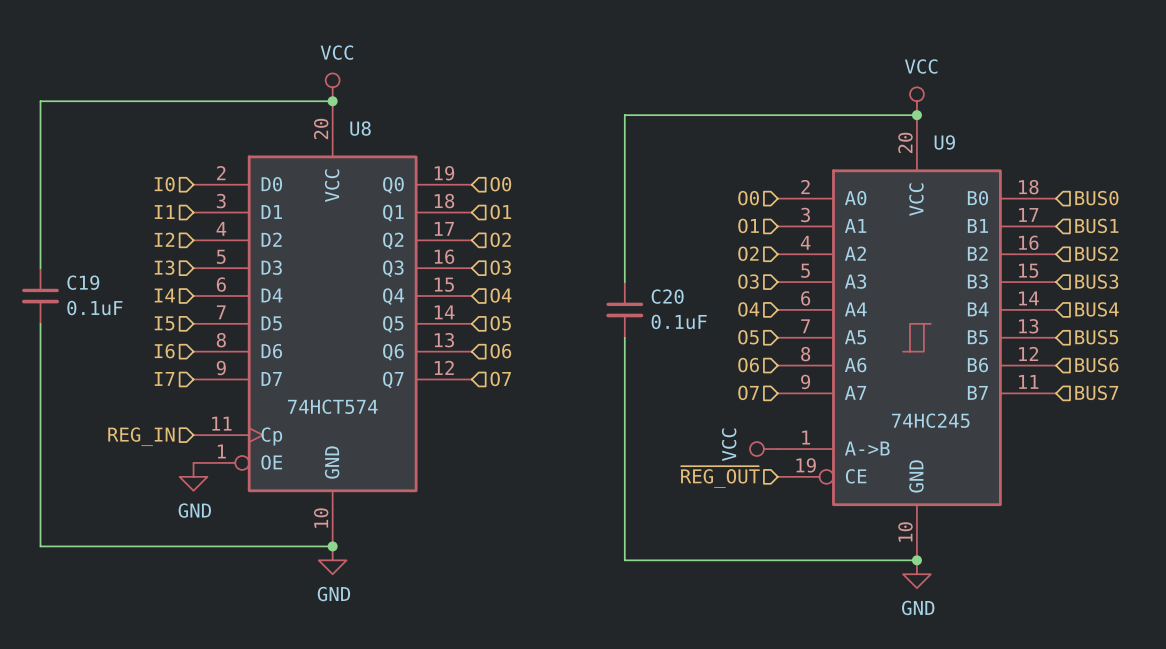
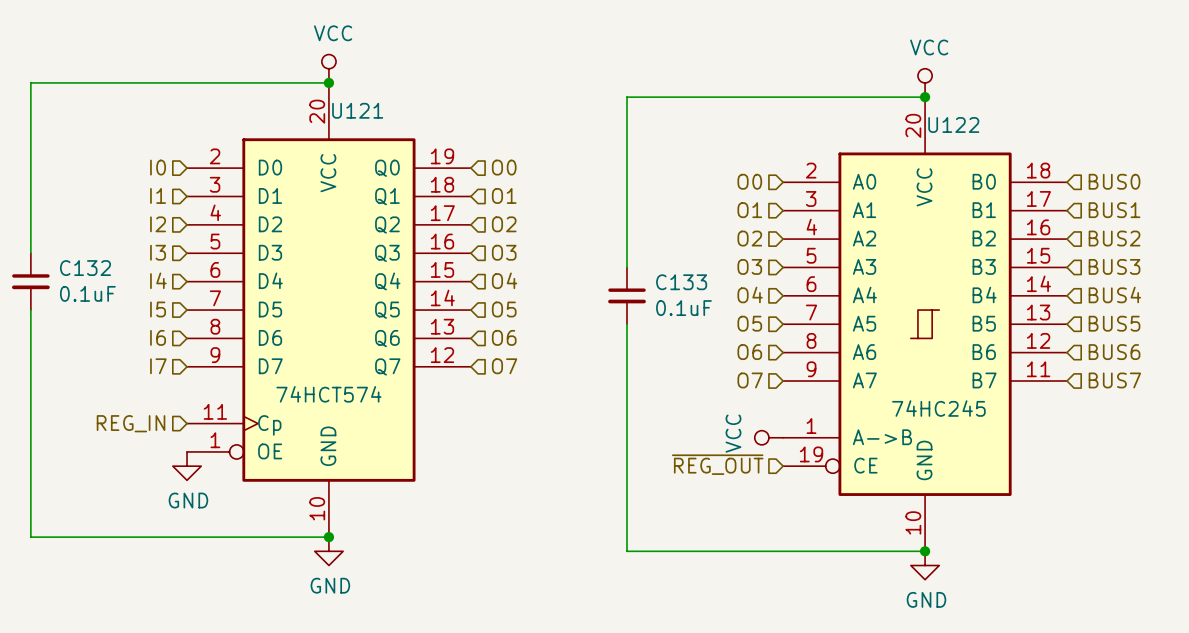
U8 name: U8 (360, 128) -> U121 (357, 110)
U9 name: U9 (944, 142) -> U122 (953, 124)
C19 name: C19 (83, 282) -> C132 (85, 268)
C20 name: C20 (667, 296) -> C133 (681, 282)

